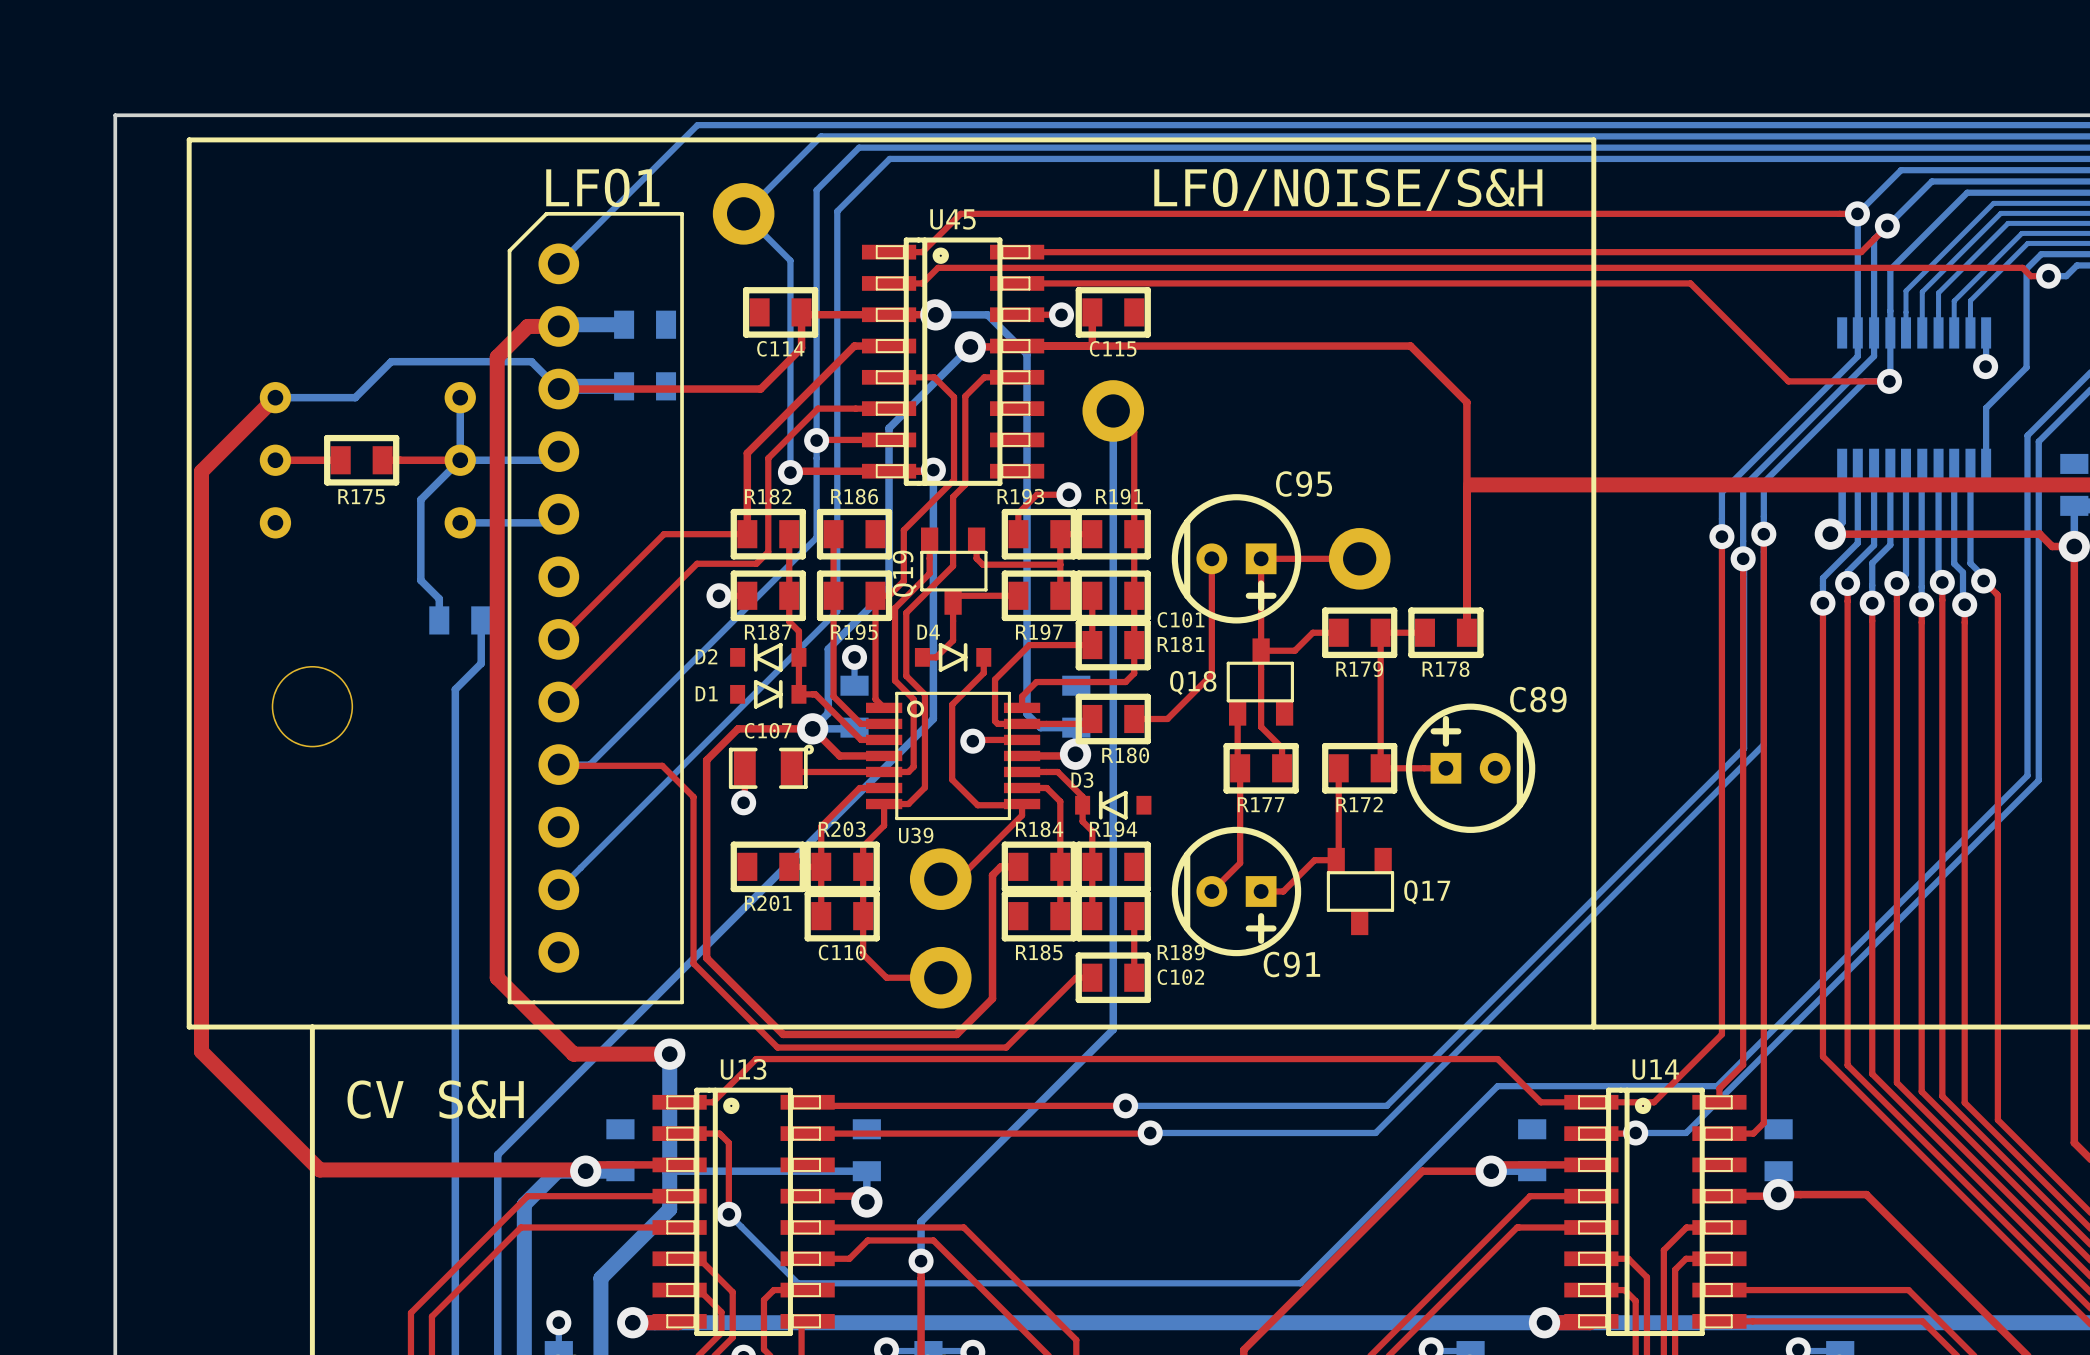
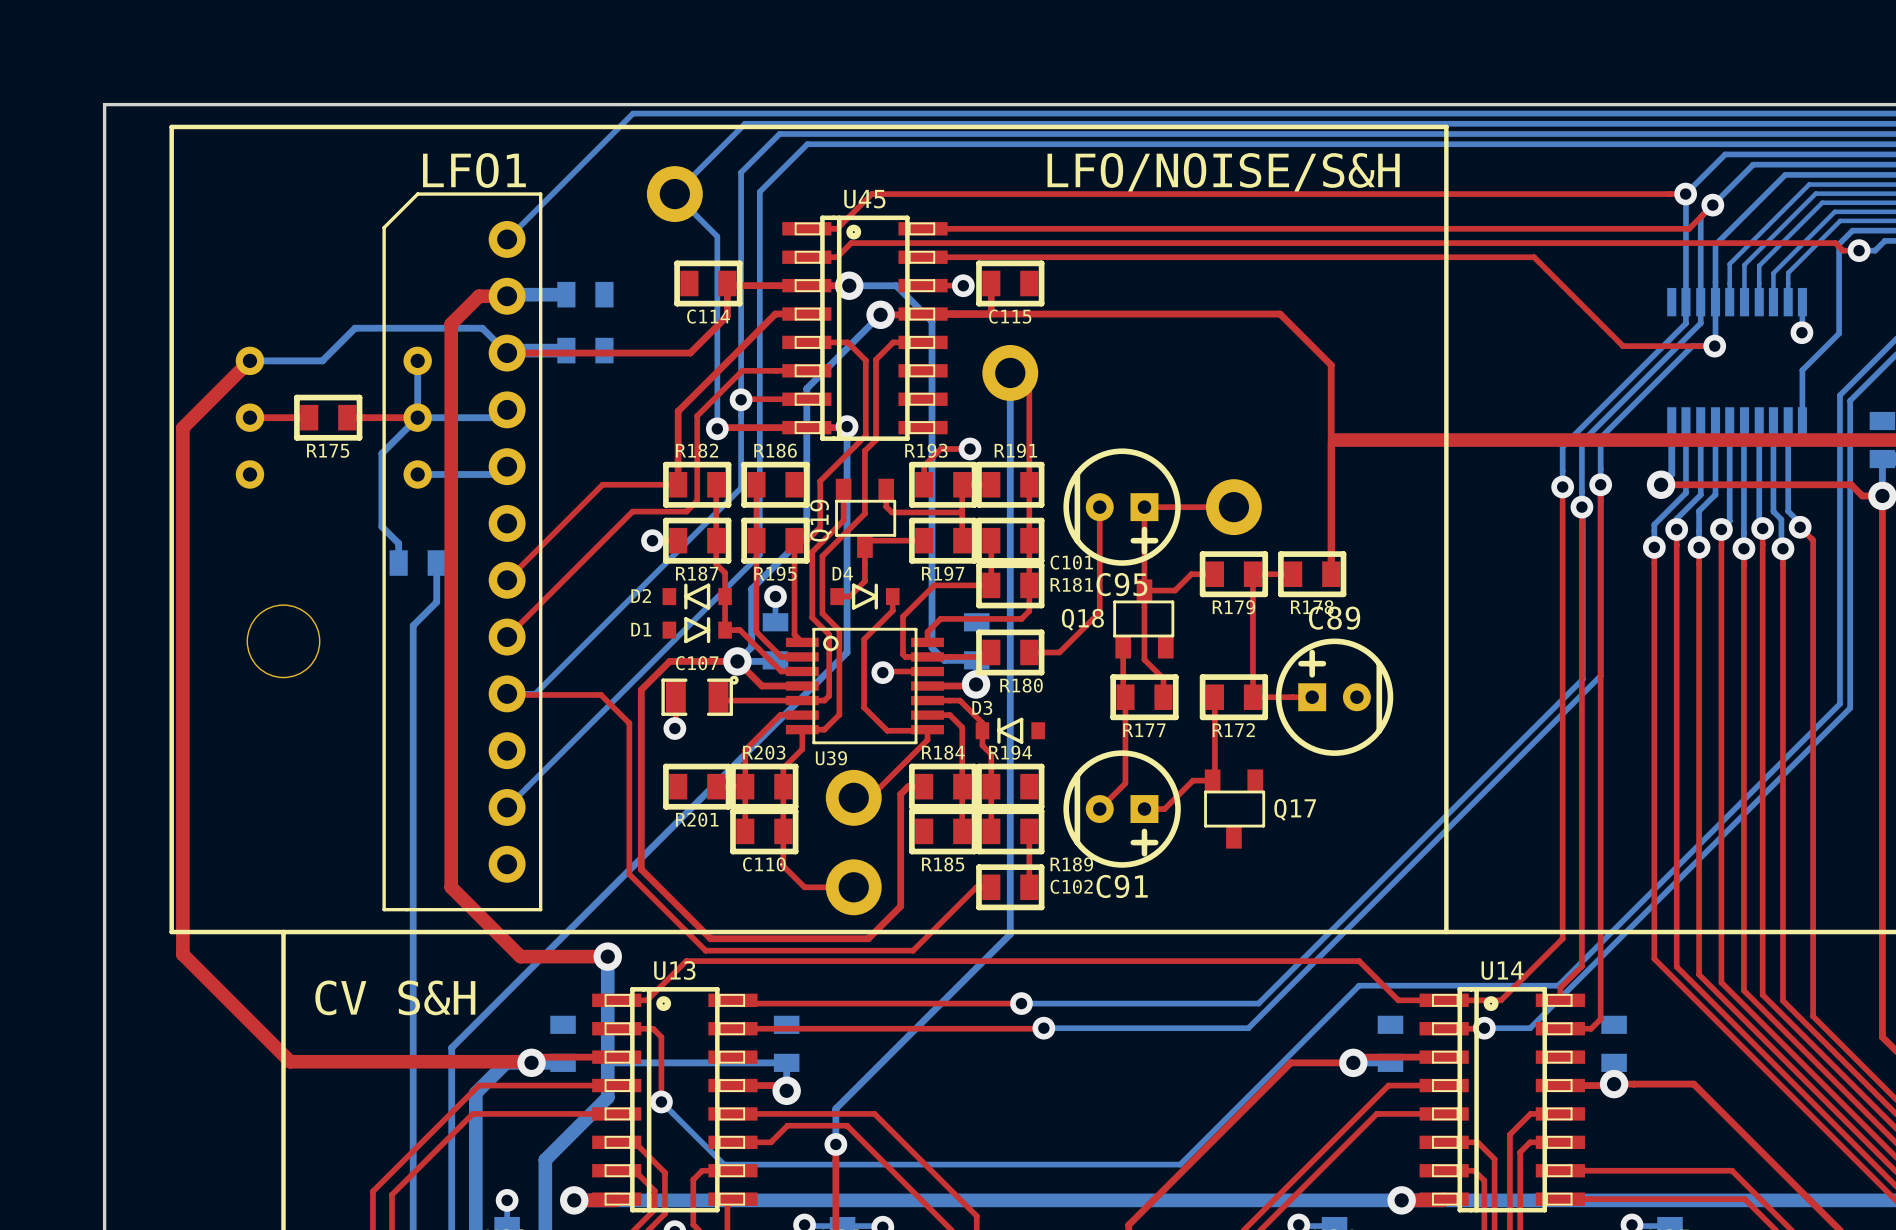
LFO1 footprint: [507, 211, 684, 1005] -> [382, 192, 543, 912]
C95 name position: C95 (1304, 483) -> C95 (1121, 584)
C89 name position: C89 (1538, 699) -> C89 (1334, 618)
C91 name position: C91 (1291, 964) -> C91 (1122, 886)

